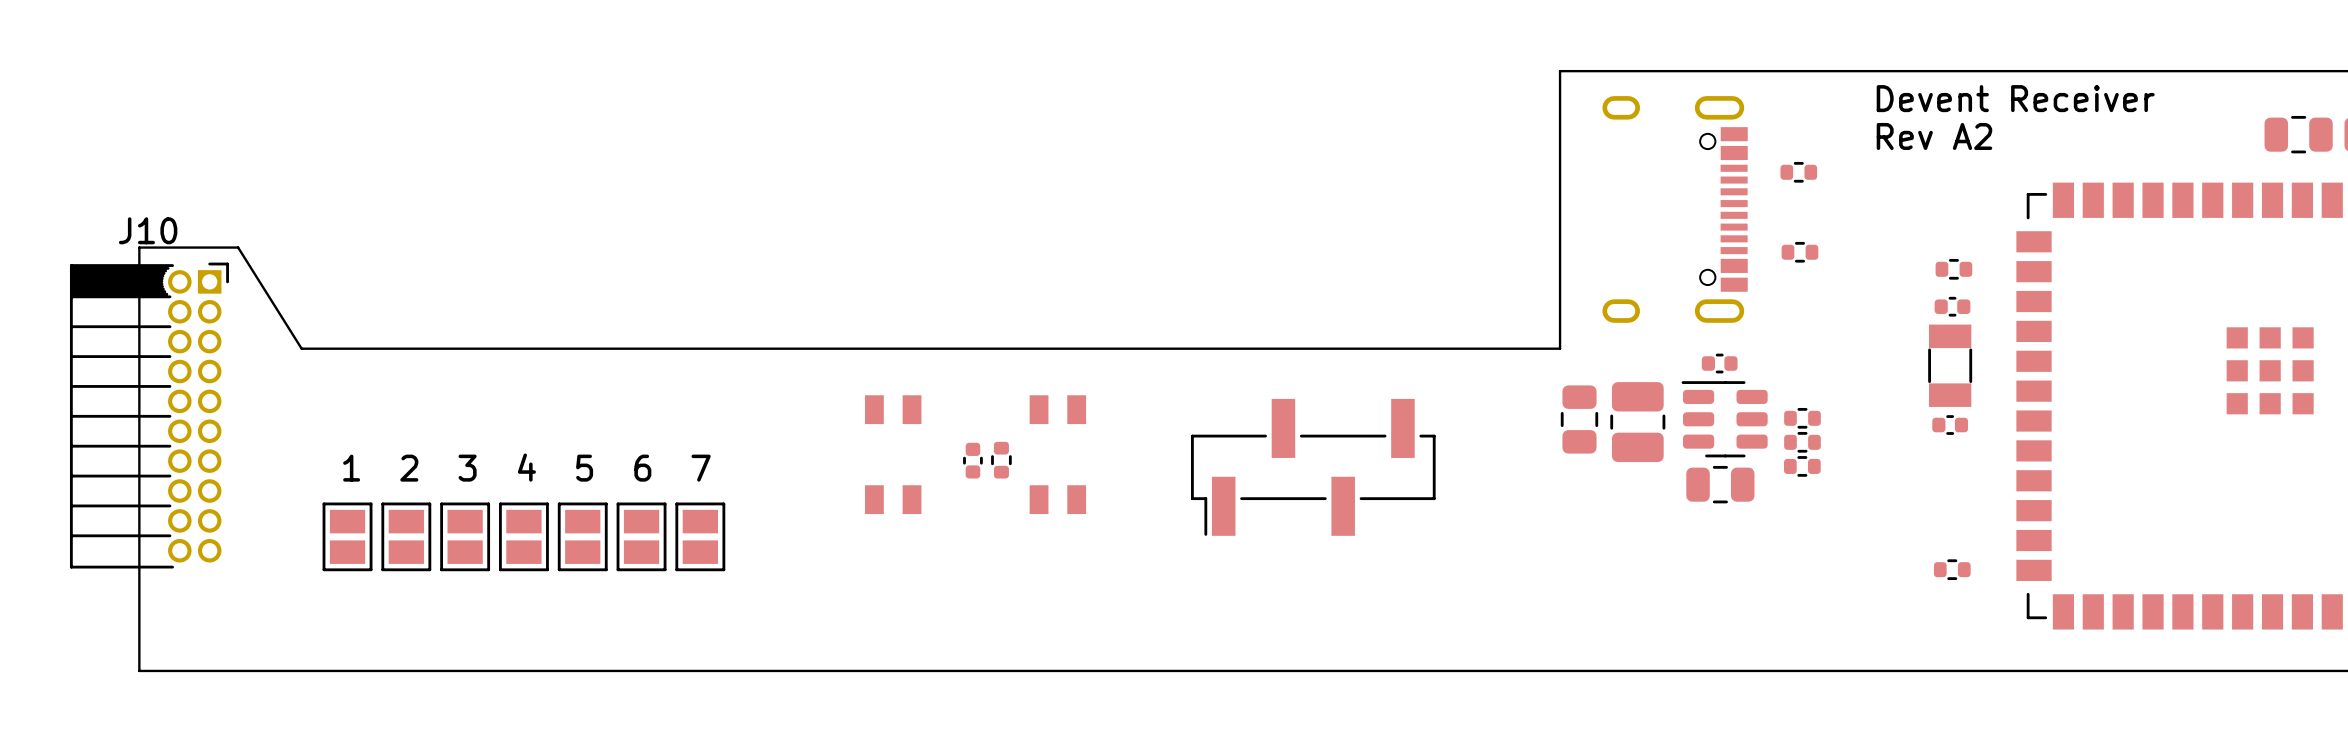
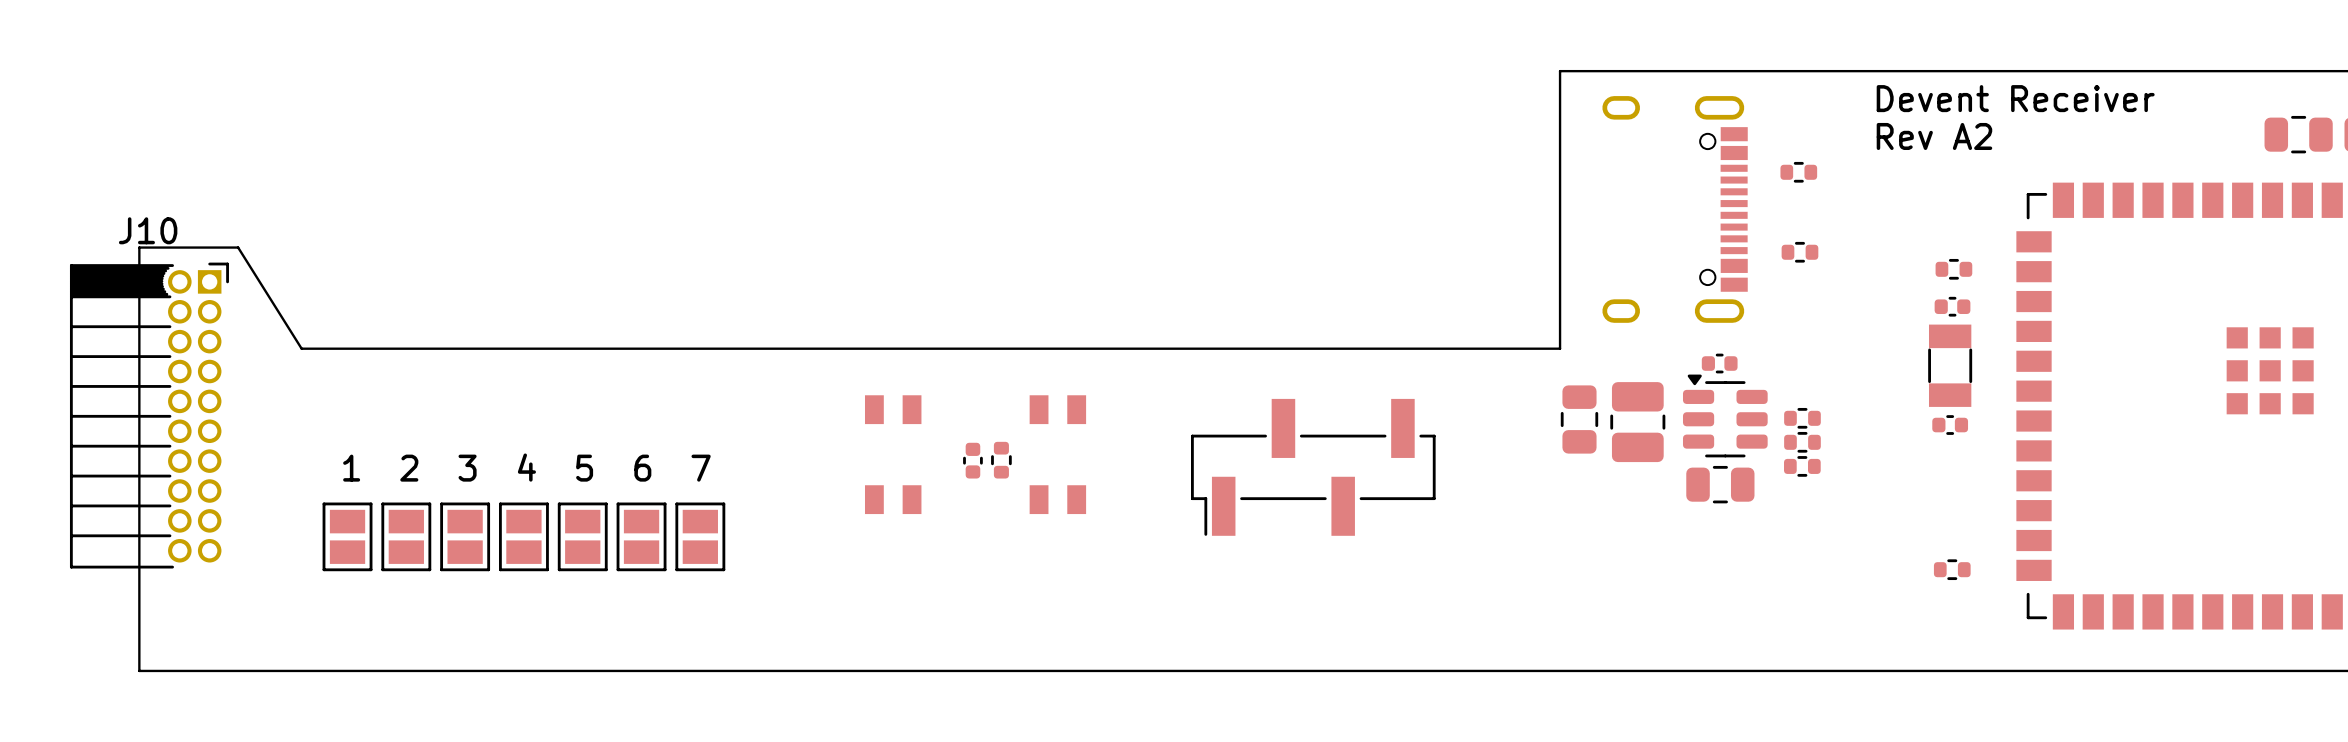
part footprint: [1681, 381, 1768, 458] -> [1682, 374, 1768, 458]

